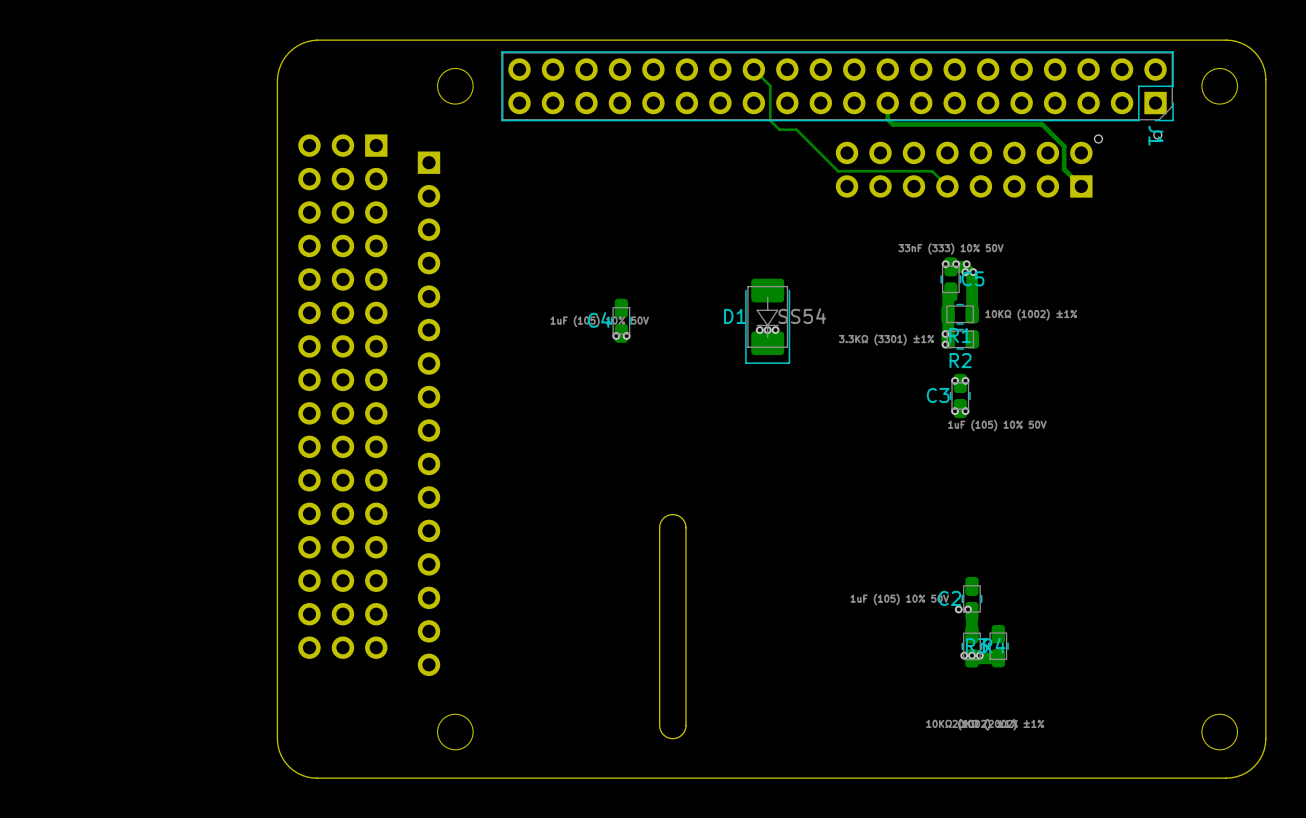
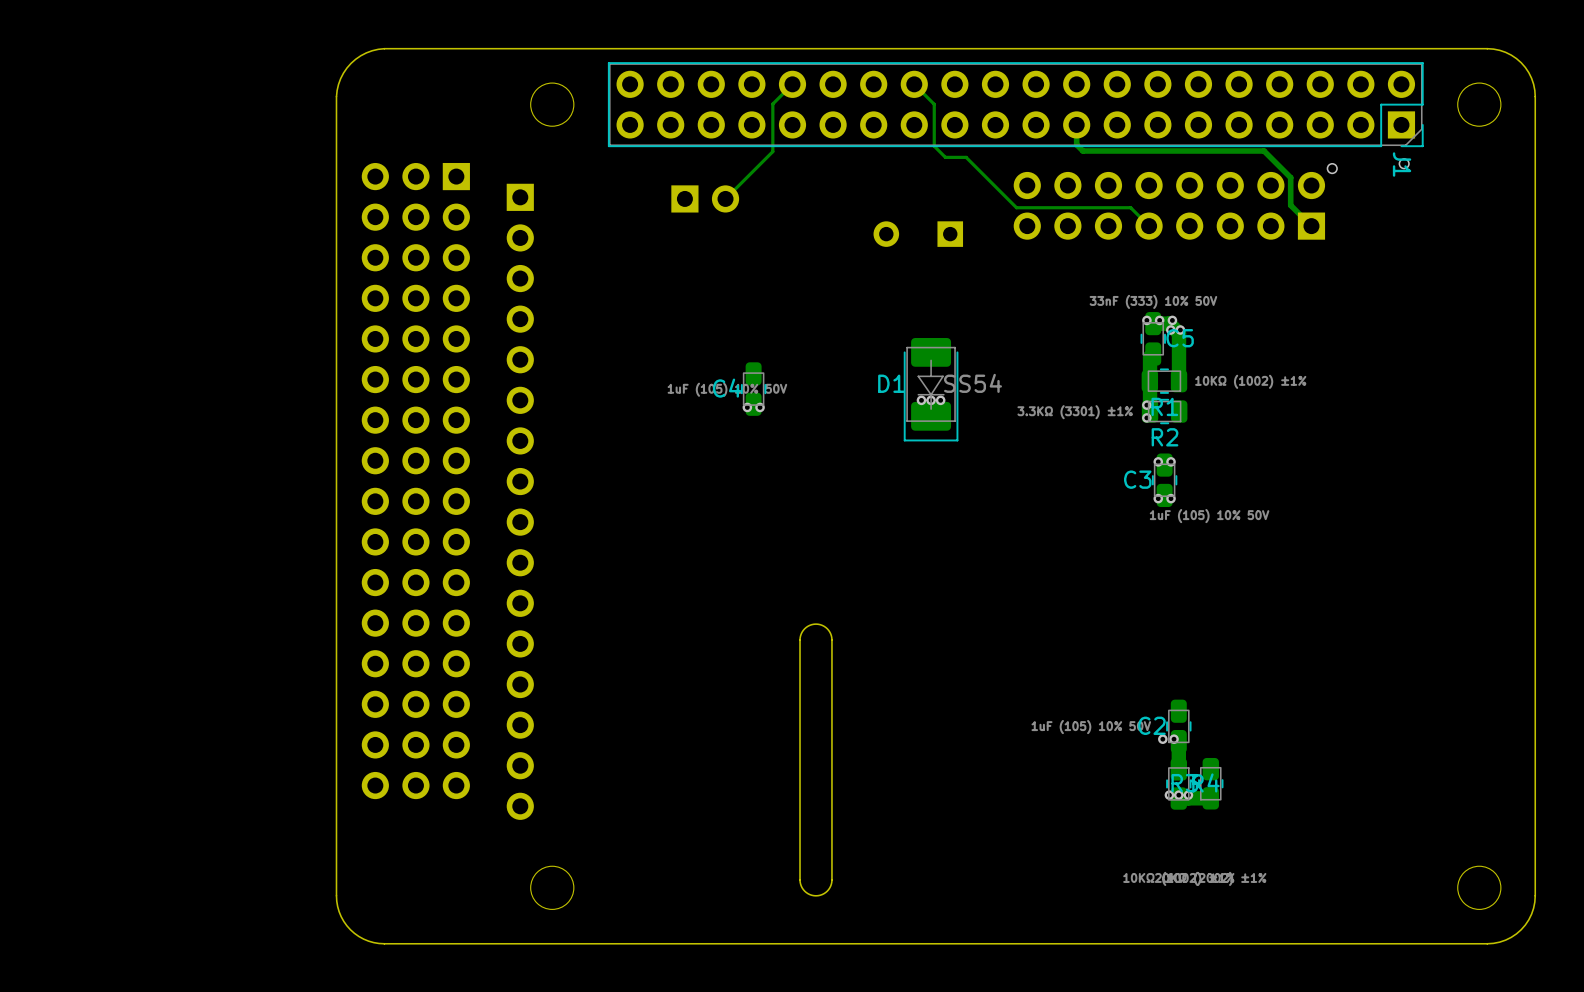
track: none -> (792, 84) (772, 104) (772, 151) (725, 198)
part: none -> (705, 198)
part: none -> (918, 234)

